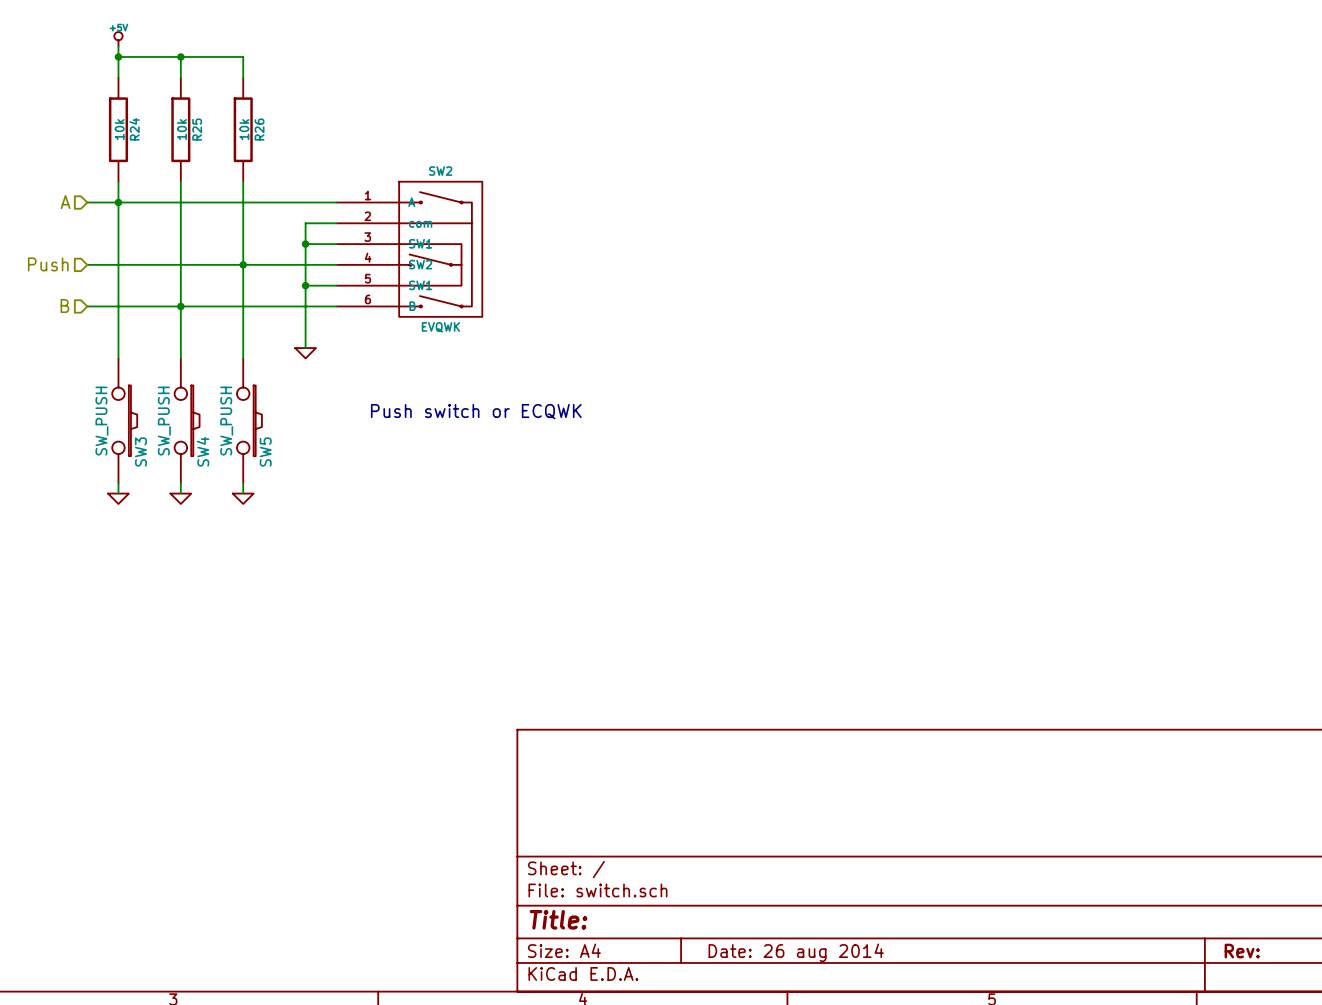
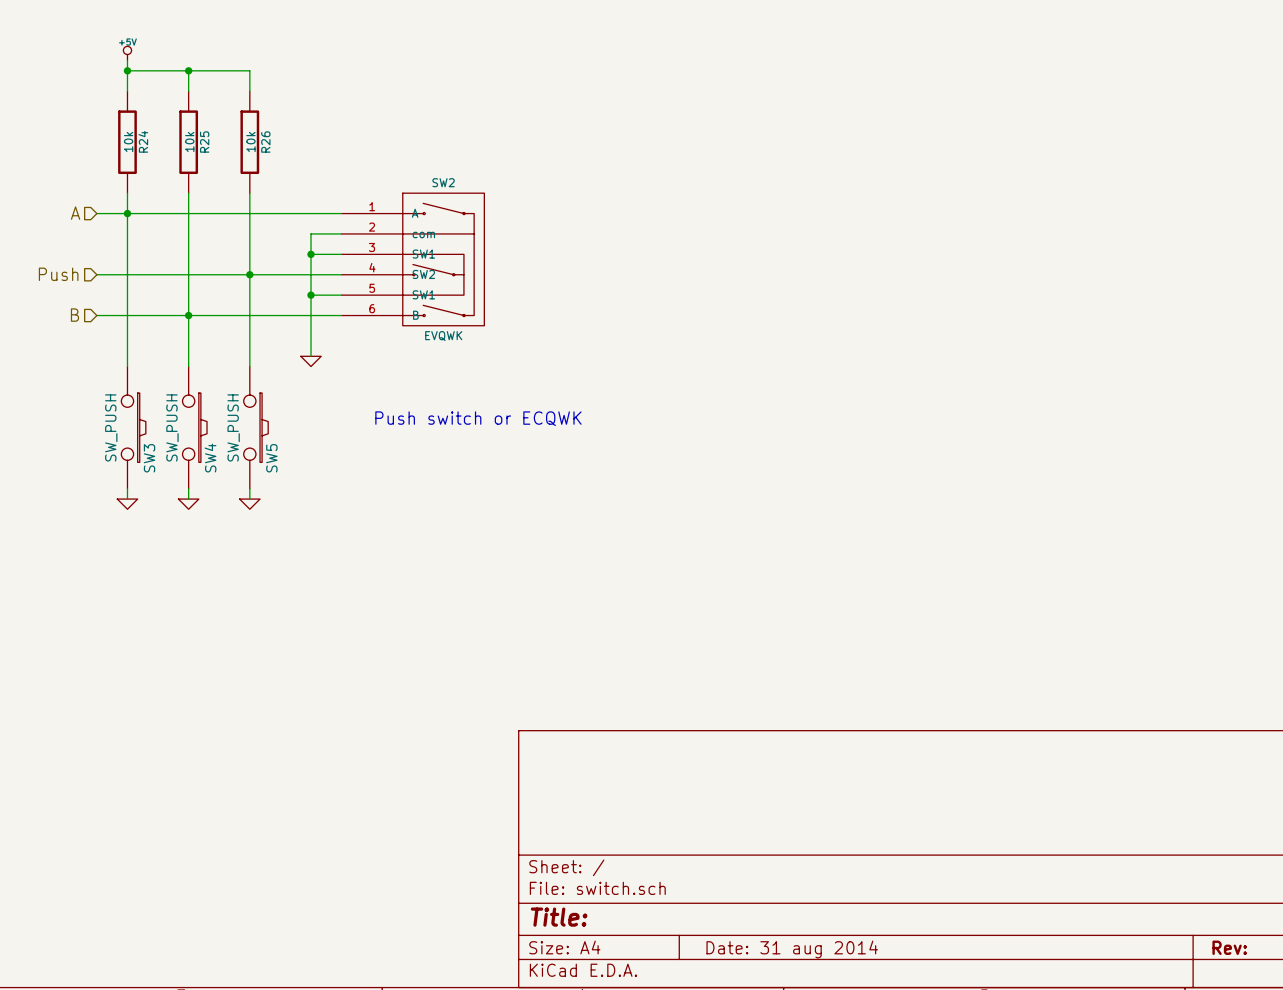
title block: Date: 26 aug 2014 (796, 952) -> Date: 31 aug 2014 (792, 949)

